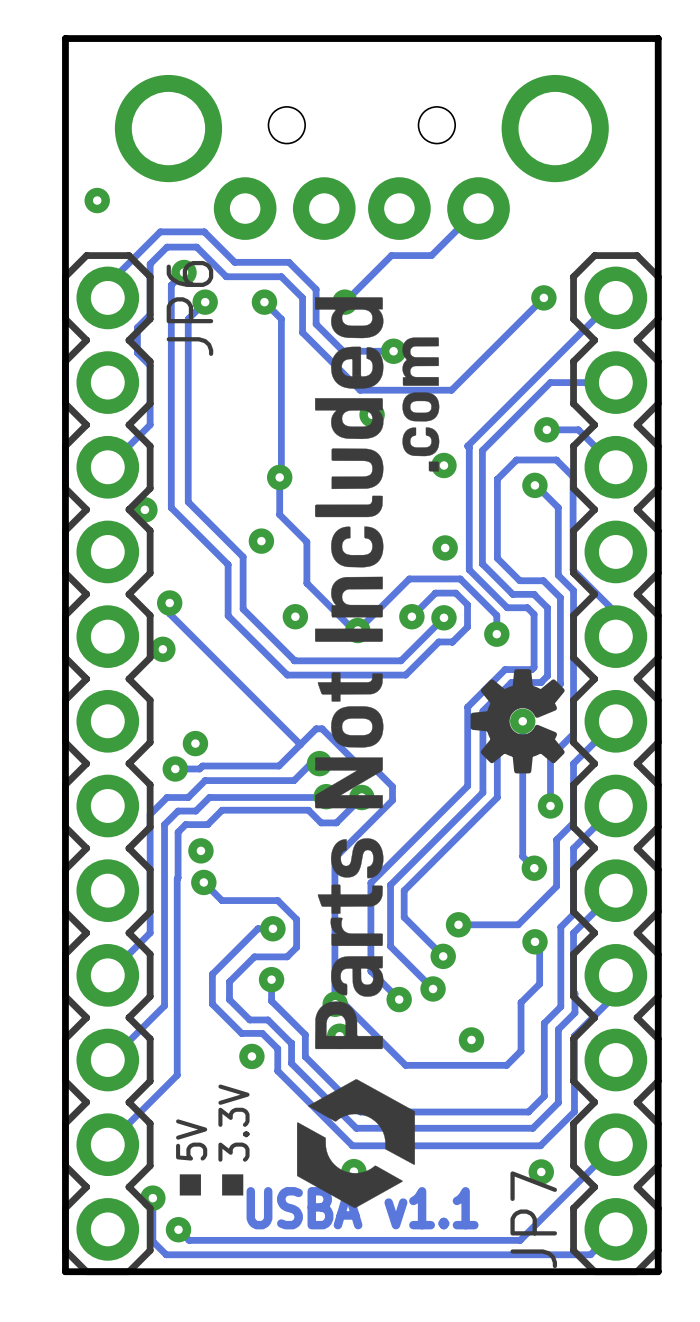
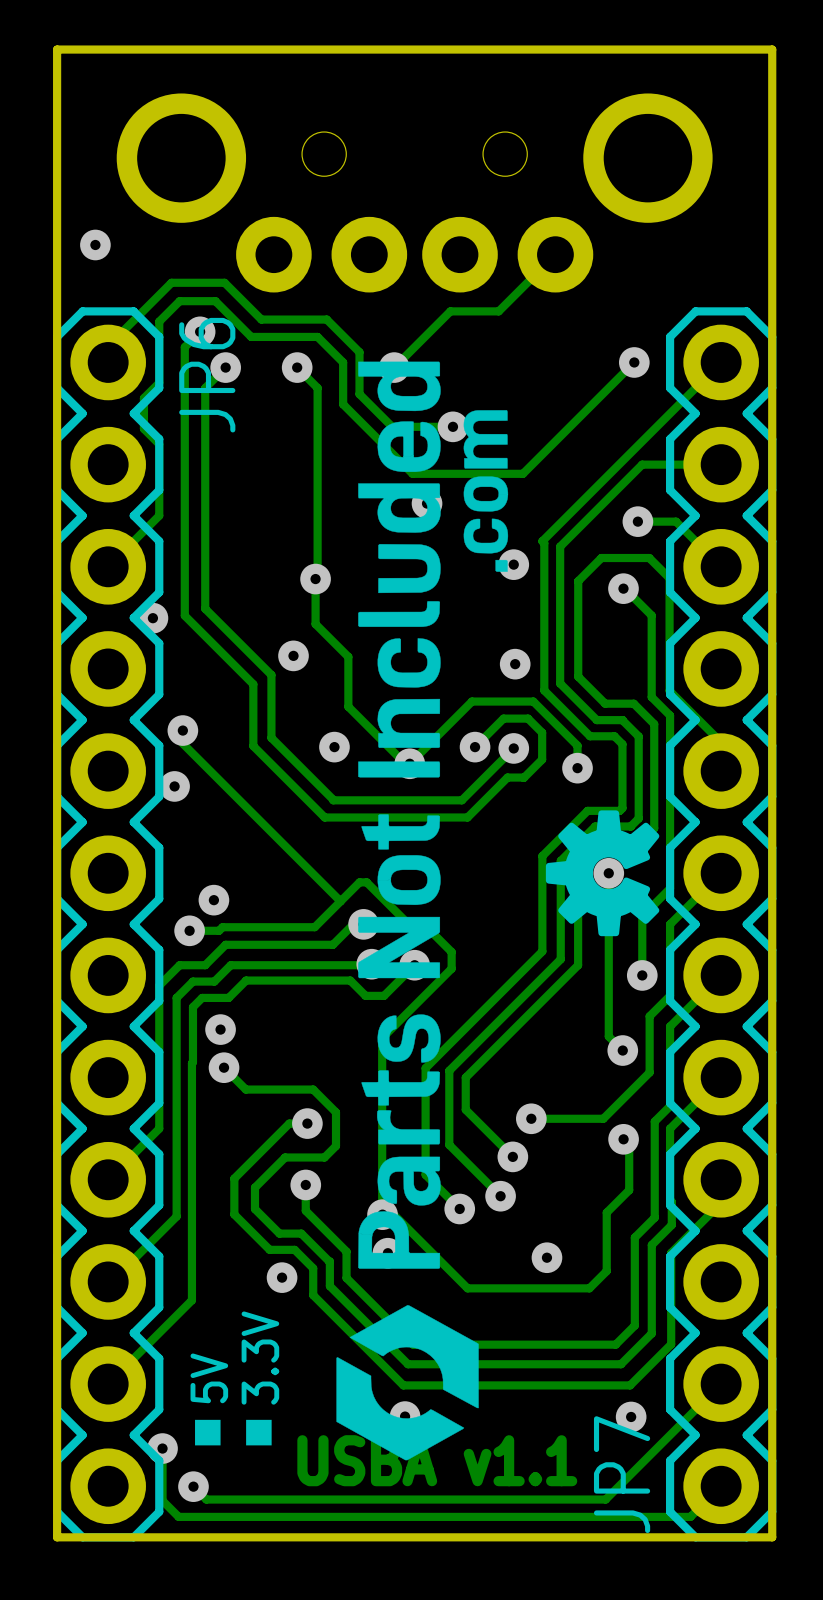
text position: USBA v1.1 (362, 1208) -> USBA v1.1 (437, 1460)

